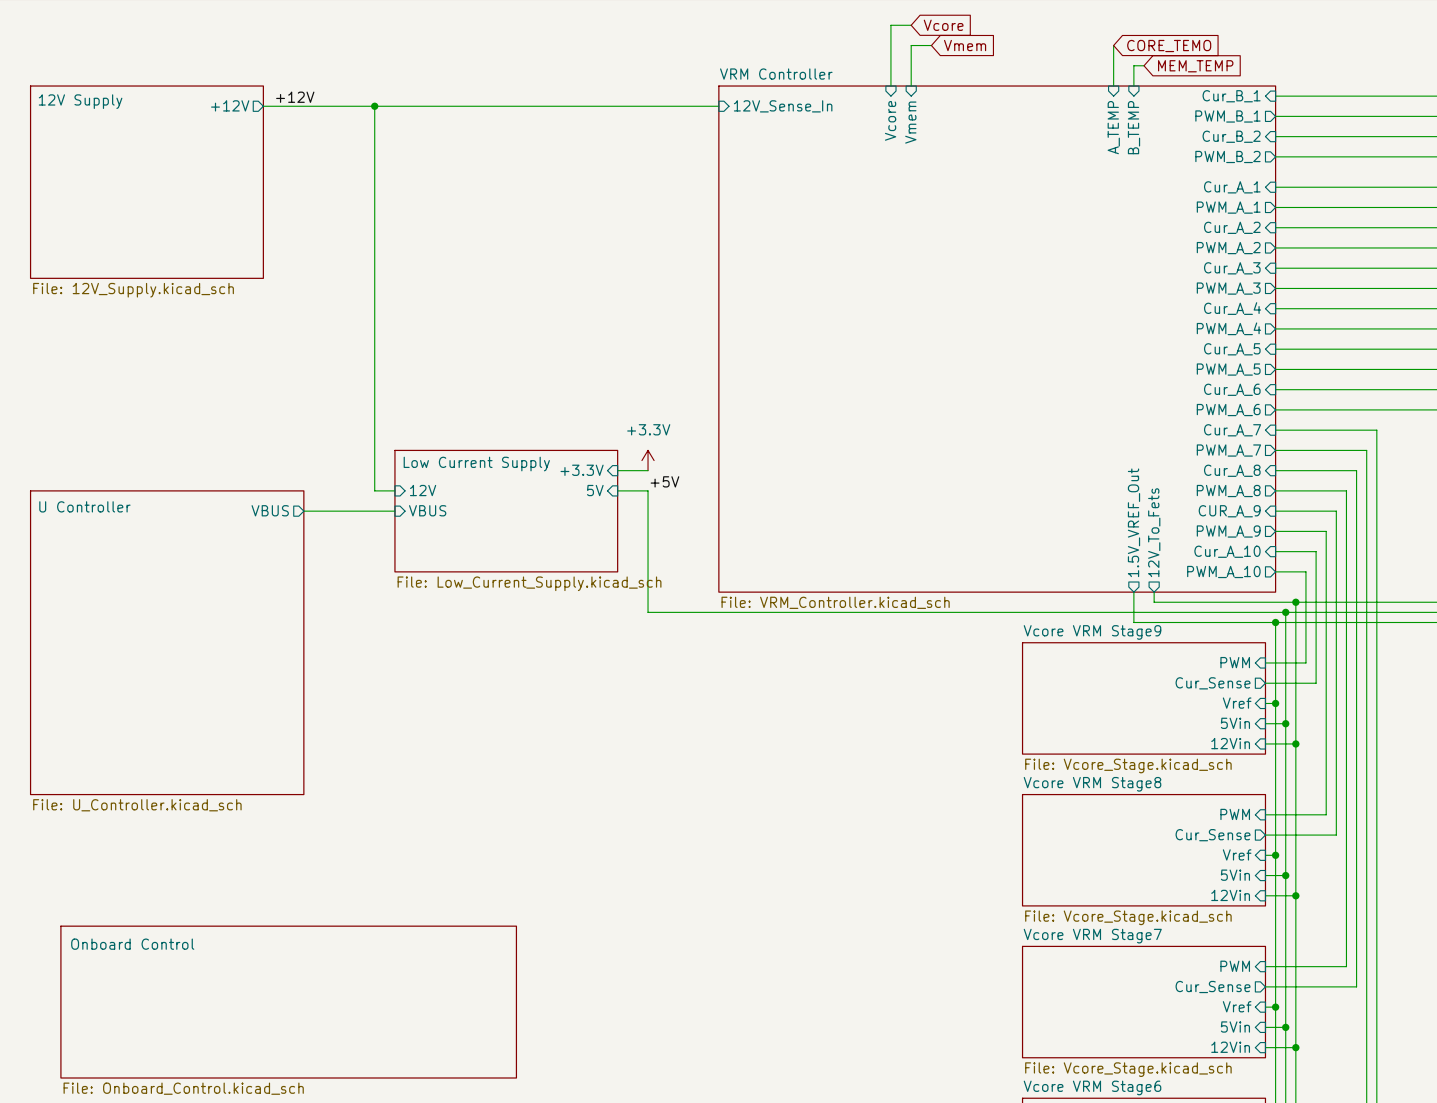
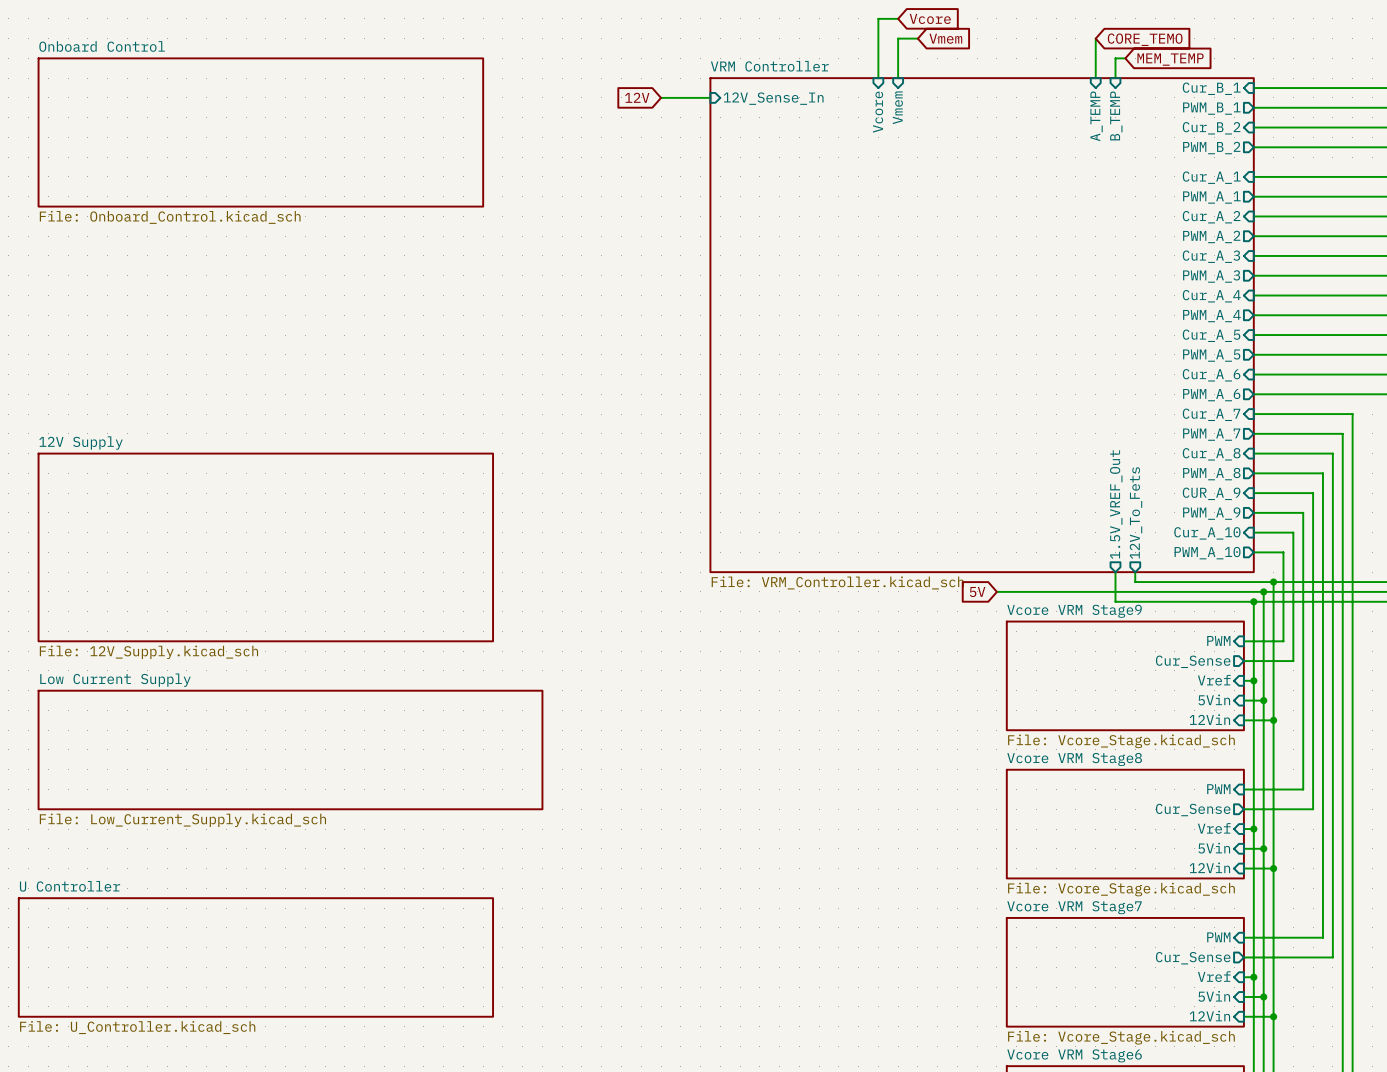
sheet 12V Supply shape: [29, 85, 264, 279] -> [37, 452, 494, 642]
label: +12V (295, 97) -> none
sheet 12V Supply name position: 12V Supply (80, 101) -> 12V Supply (81, 443)
sheet pin: +12V (230, 105) -> none
wire: (263, 106) (668, 106) -> none
wire: (374, 106) (374, 490) (394, 490) -> none
junction: (374, 106) -> none
global label: none -> 12V (637, 97)
sheet Onboard Control: none -> File: Onboard_Control.kicad_sch (260, 132)
sheet 12V Supply value position: File: 12V_Supply.kicad_sch (133, 290) -> File: 12V_Supply.kicad_sch (148, 652)
power symbol: +3.3V (648, 460) -> none
sheet pin: +3.3V (582, 470) -> none
wire: (617, 470) (648, 470) -> none
label: +5V (664, 481) -> none
sheet pin: 12V (423, 490) -> none
sheet pin: 5V (595, 490) -> none
wire: (617, 490) (648, 490) (648, 612) (1012, 612) -> none
sheet pin: VBUS (270, 510) -> none
sheet pin: VBUS (427, 510) -> none
wire: (303, 511) (394, 511) -> none
sheet Low Current Supply: File: Low_Current_Supply.kicad_sch (506, 511) -> none
global label: none -> 5V (977, 591)
sheet U Controller: File: U_Controller.kicad_sch (167, 642) -> none
sheet Low Current Supply: none -> File: Low_Current_Supply.kicad_sch (290, 749)
sheet U Controller: none -> File: U_Controller.kicad_sch (255, 957)
sheet Onboard Control: File: Onboard_Control.kicad_sch (288, 1002) -> none

